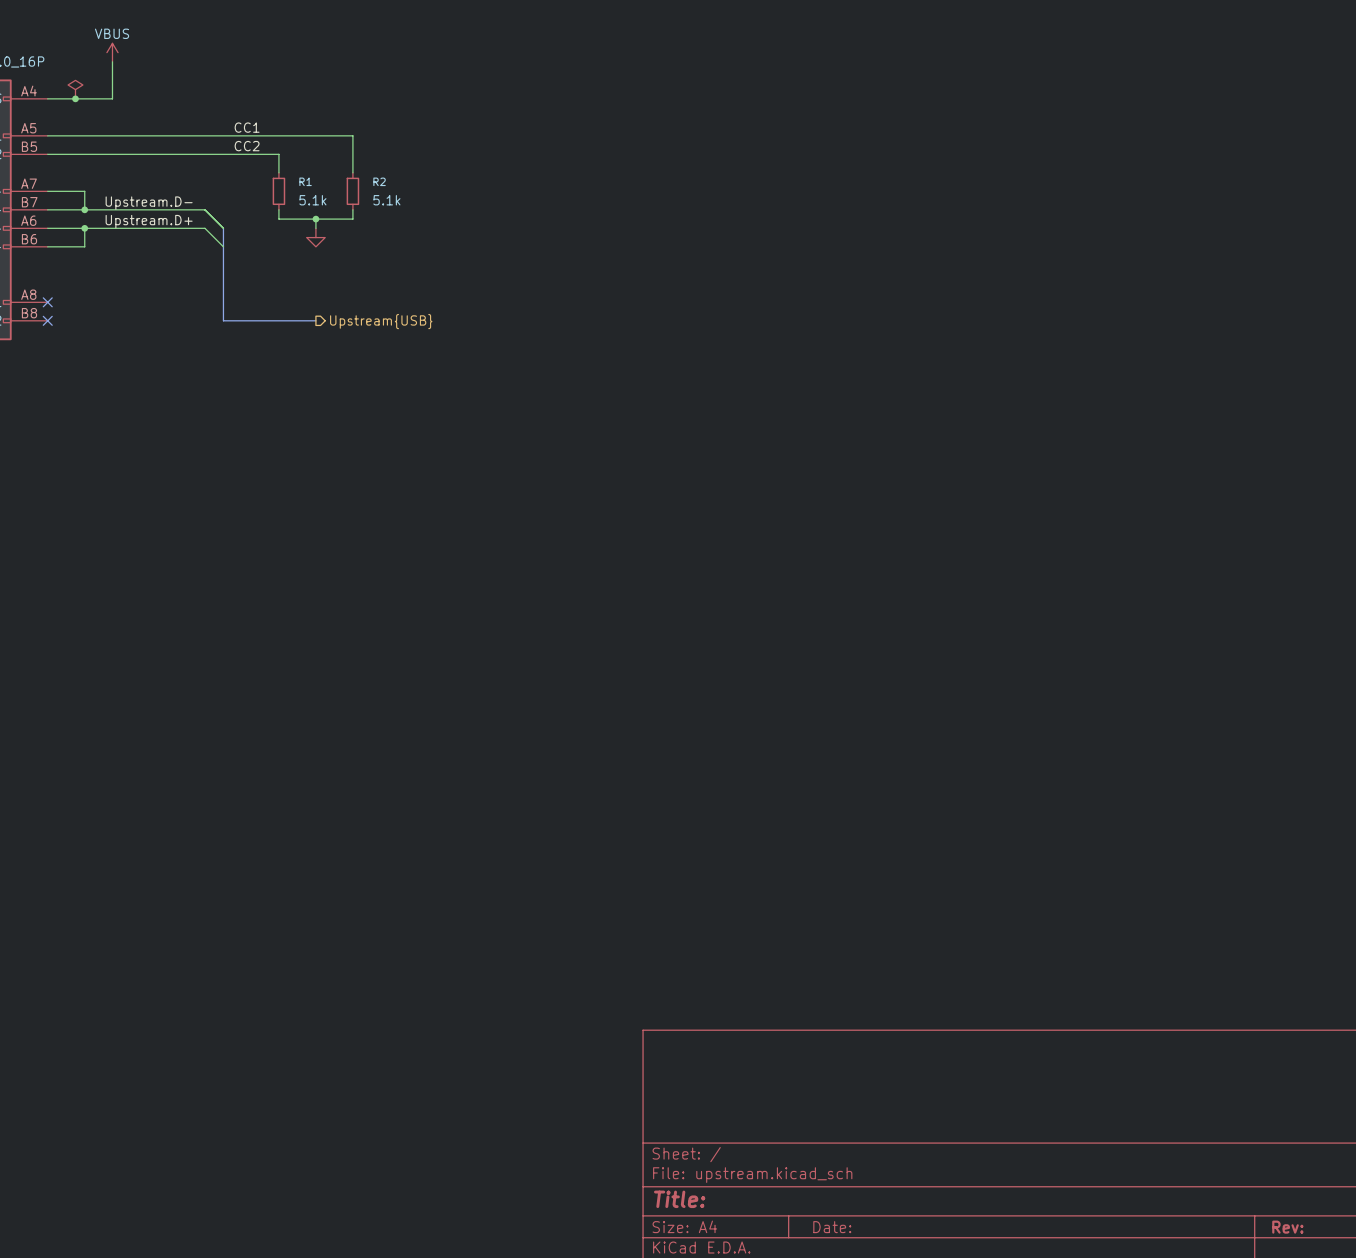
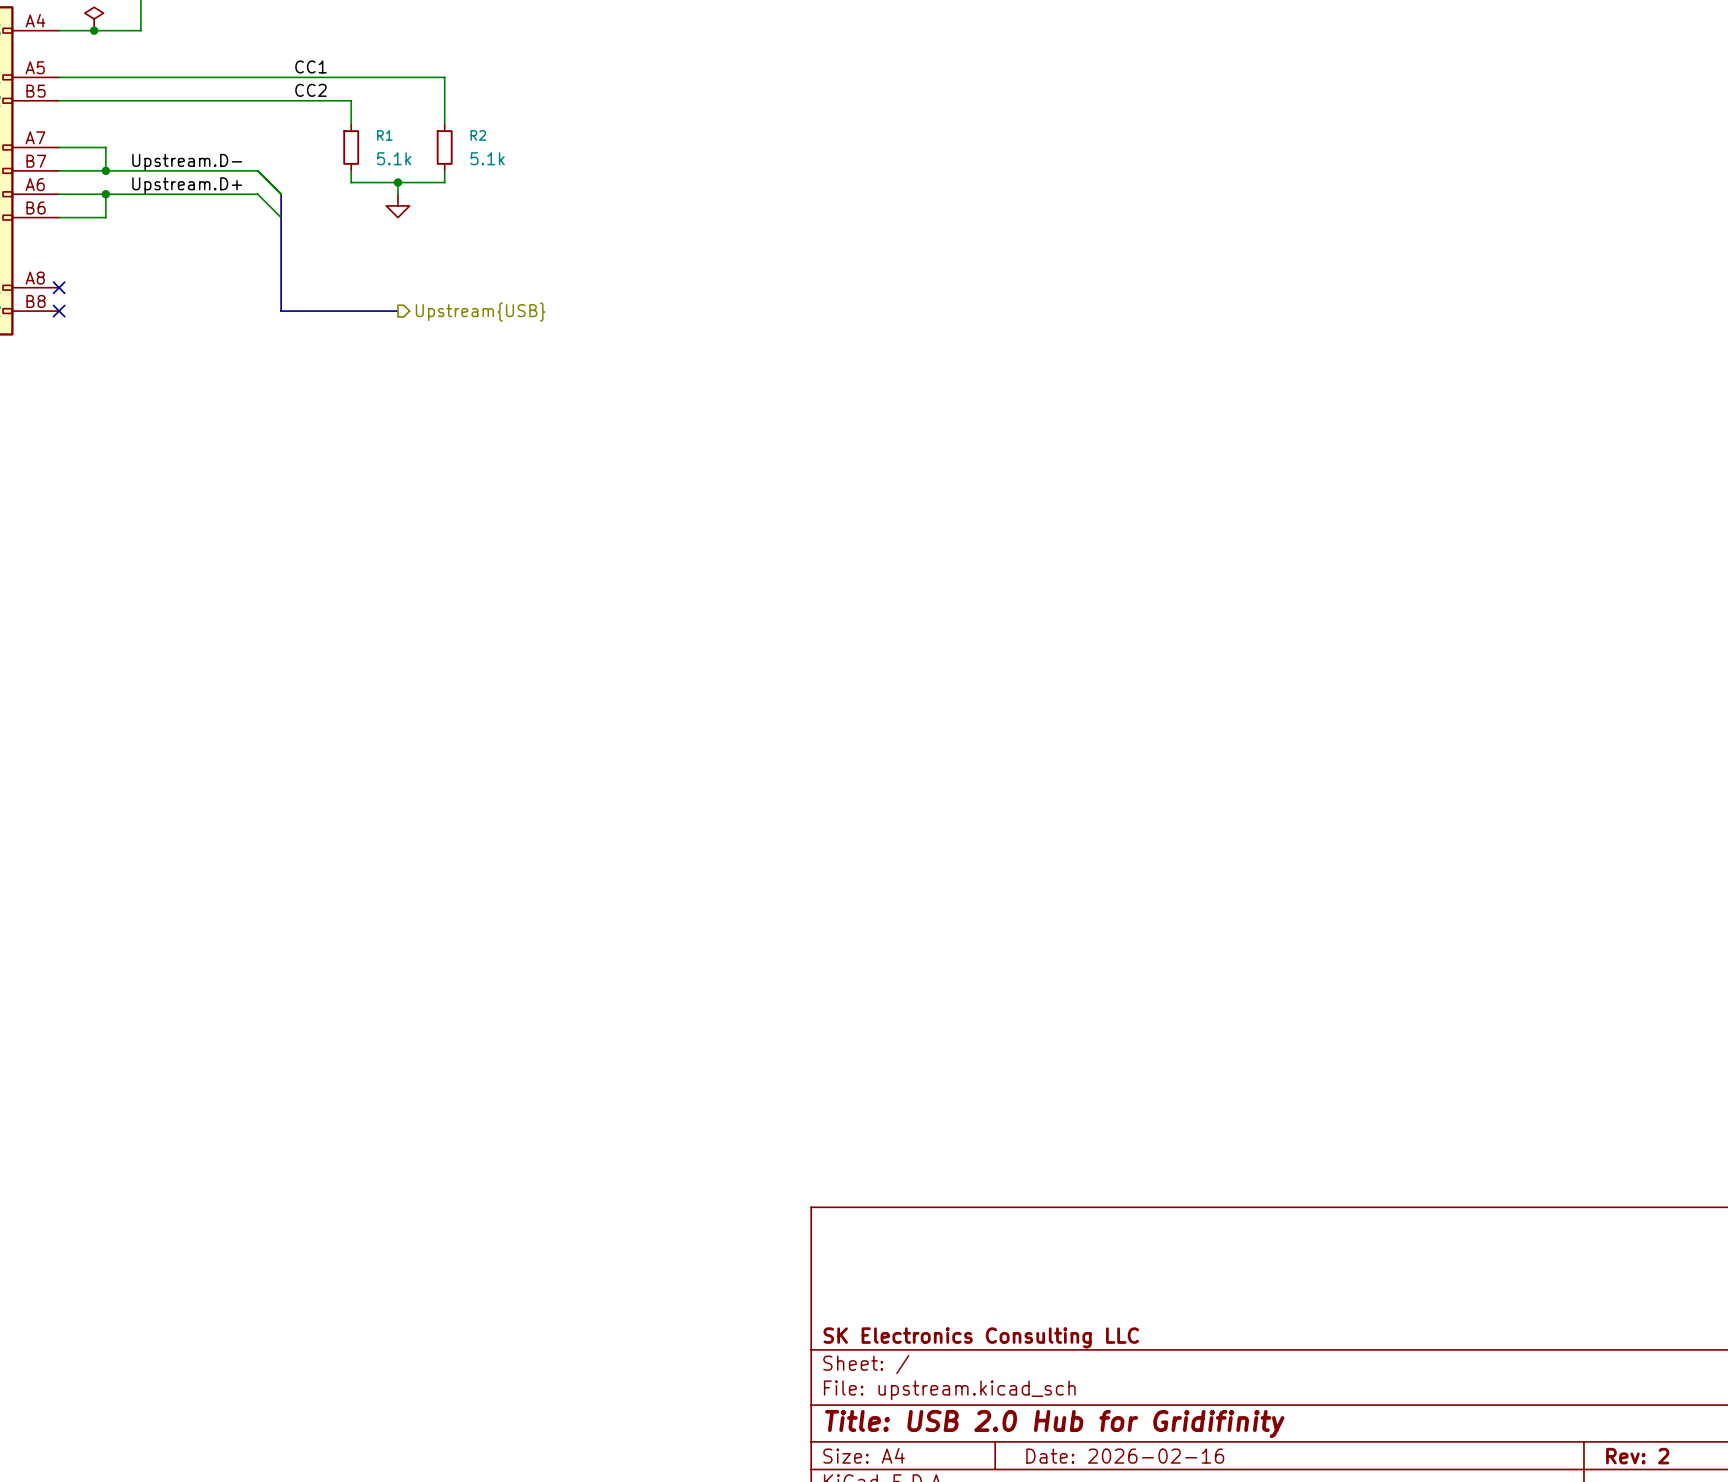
title block: none -> SK Electronics Consulting LLC (981, 1337)
title block: Title: (679, 1199) -> Title: USB 2.0 Hub for Gridifinity (1054, 1424)
title block: Date: (832, 1227) -> Date: 2026-02-16 (1125, 1456)
title block: Rev: (1287, 1227) -> Rev: 2 (1637, 1456)

